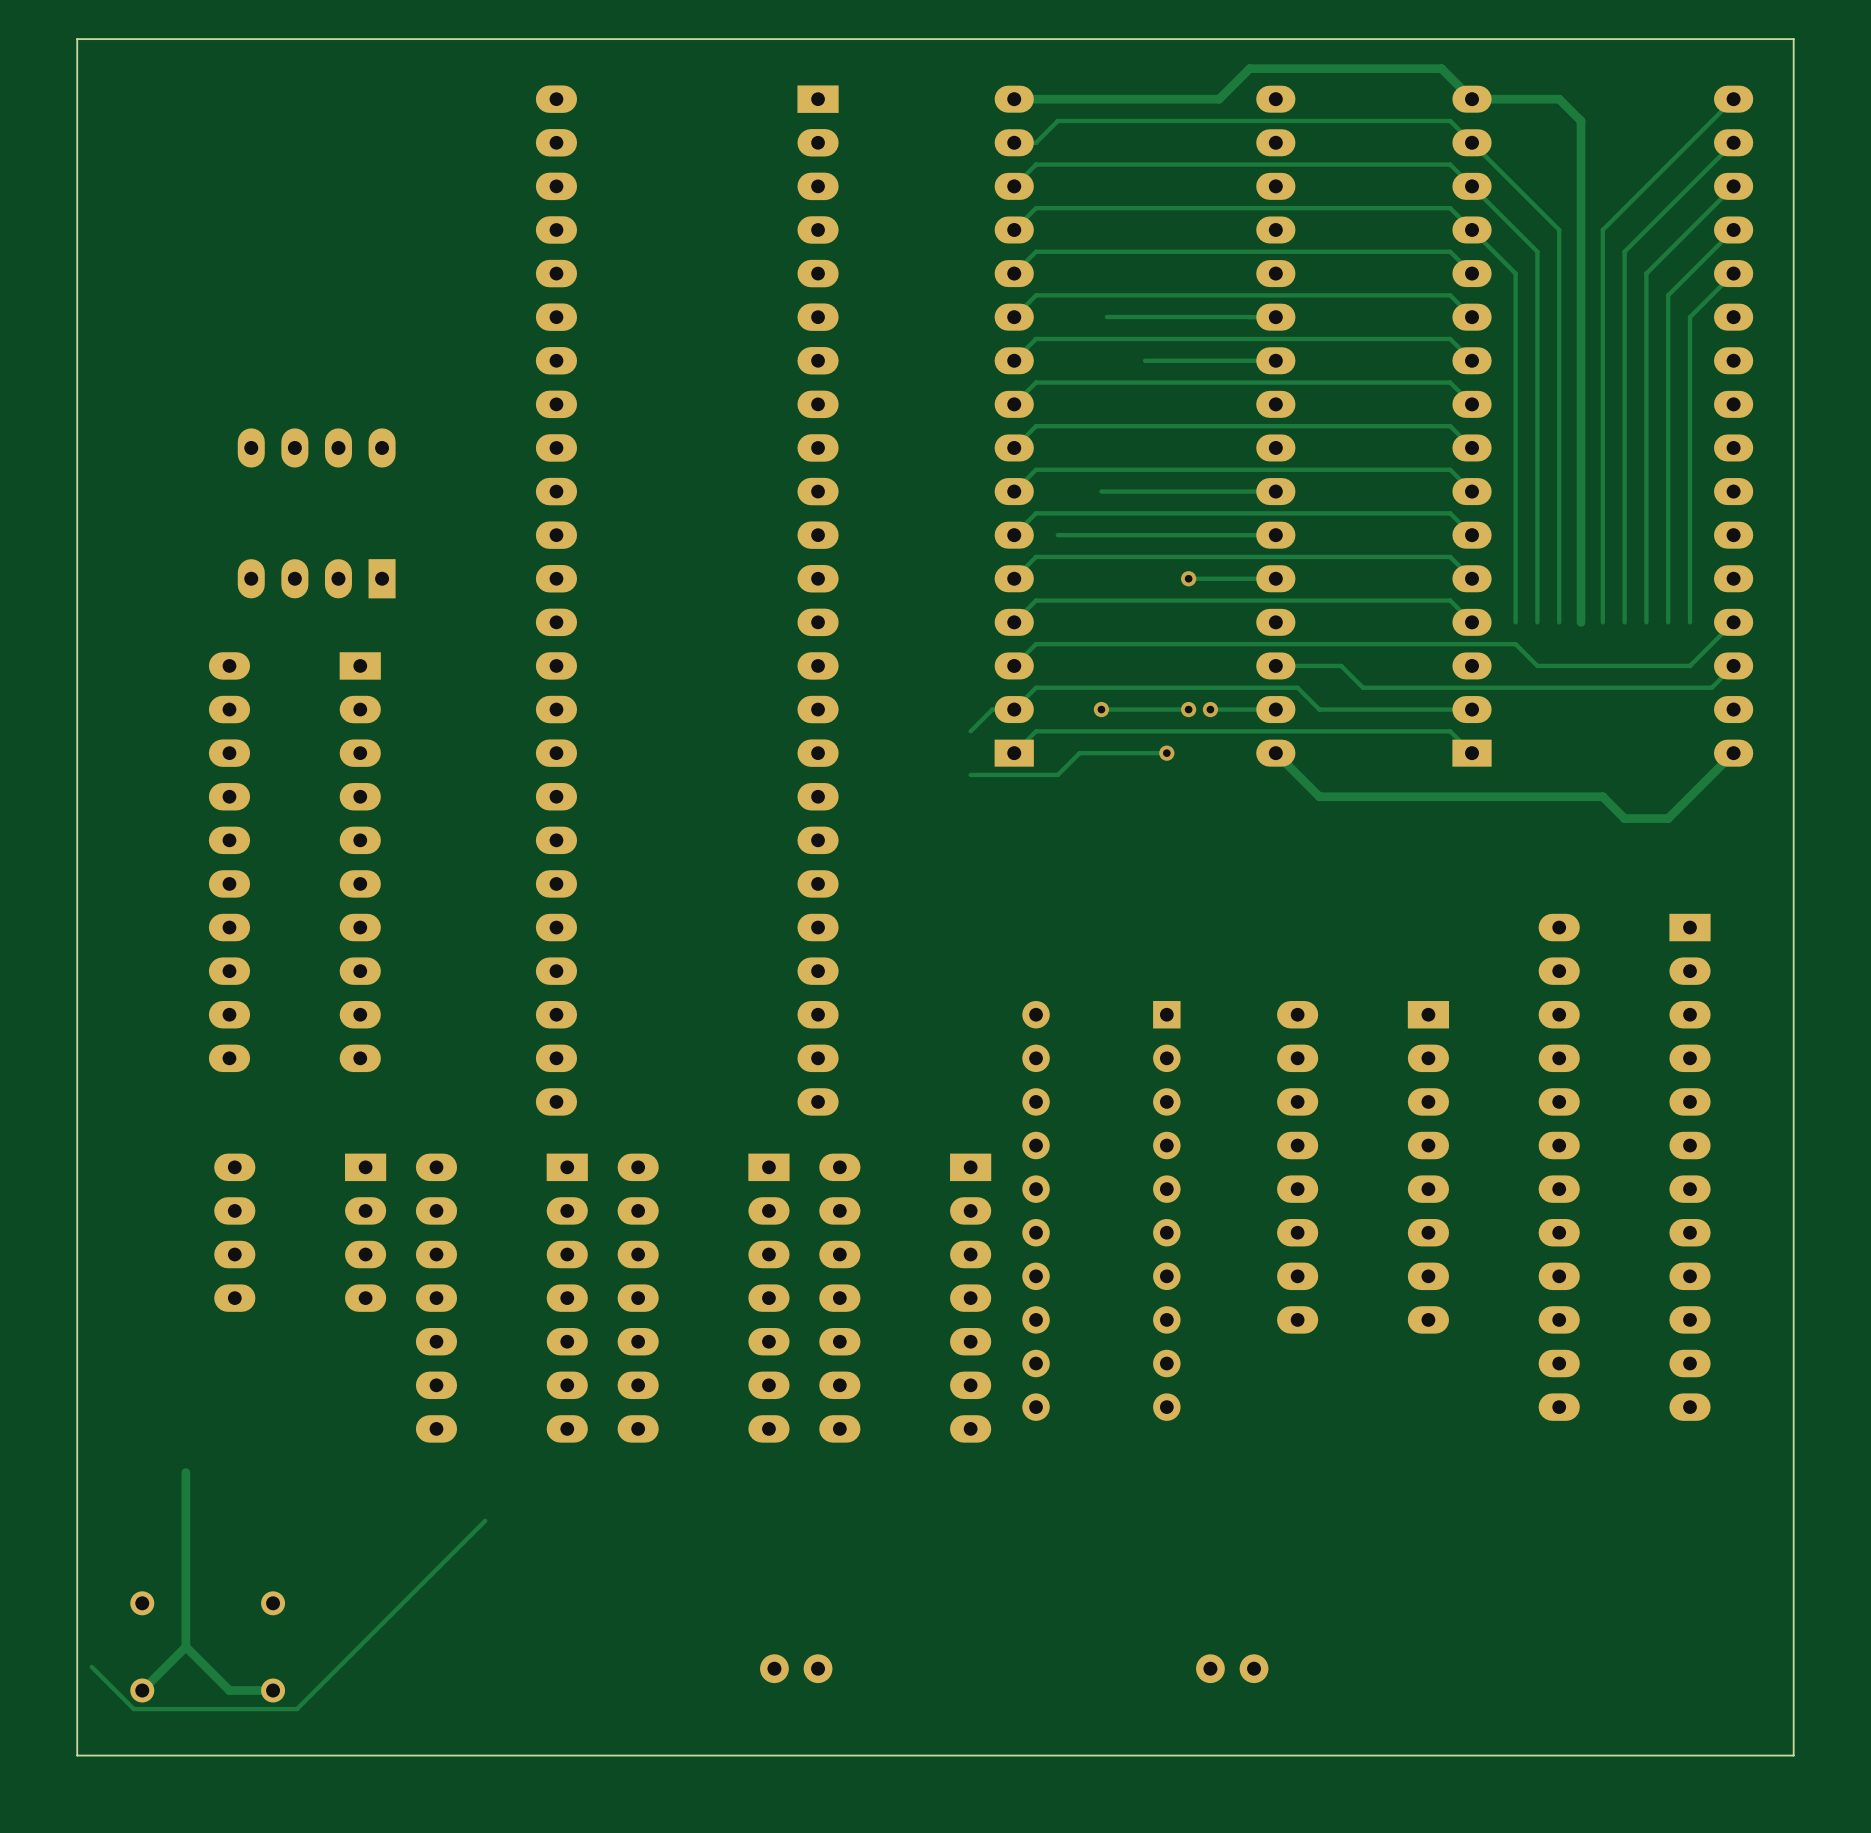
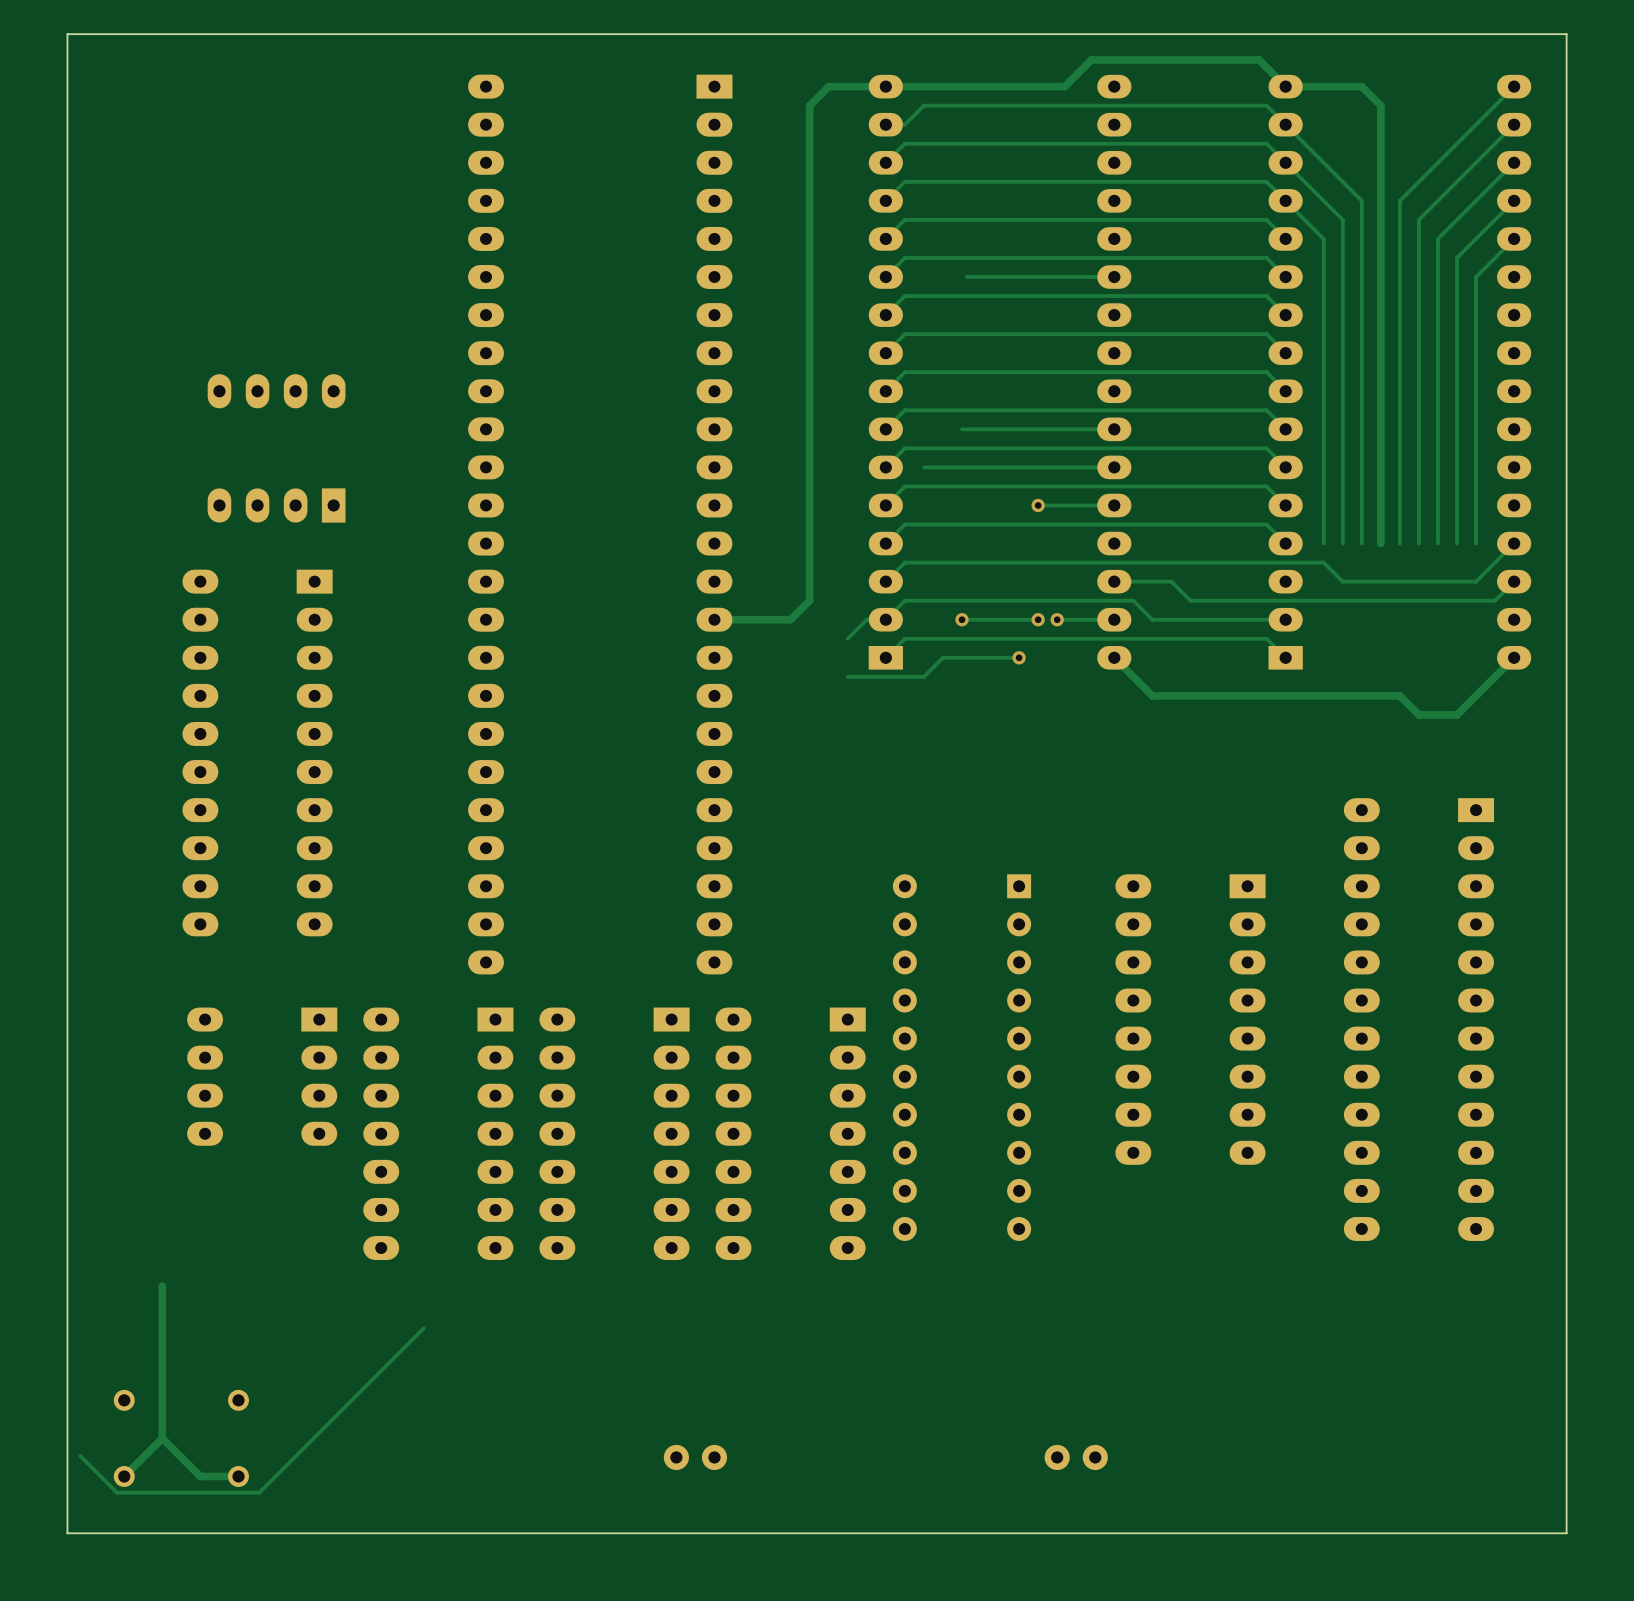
track: none -> (885, 86) (828, 86) (809, 105) (809, 600) (790, 619) (714, 619)
track: (1275, 360) (1145, 360) -> none

